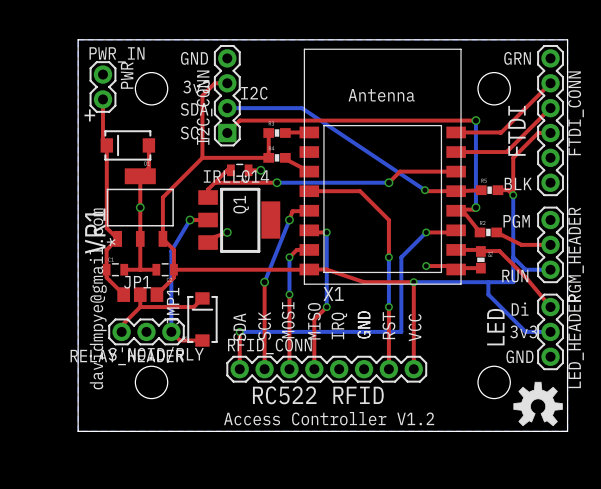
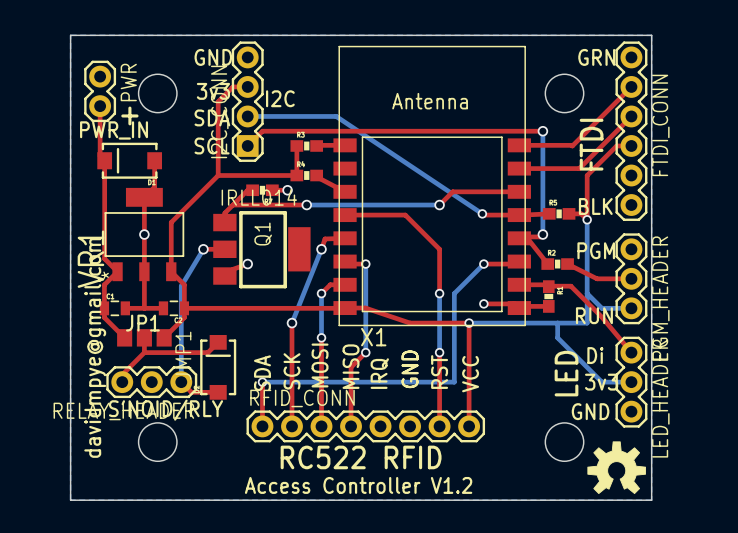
text: PWR_IN (117, 54) -> none
text: none -> + (129, 115)
text: + (89, 115) -> PWR_IN (114, 130)
part: (239, 170) -> none
part: none -> (262, 190)

